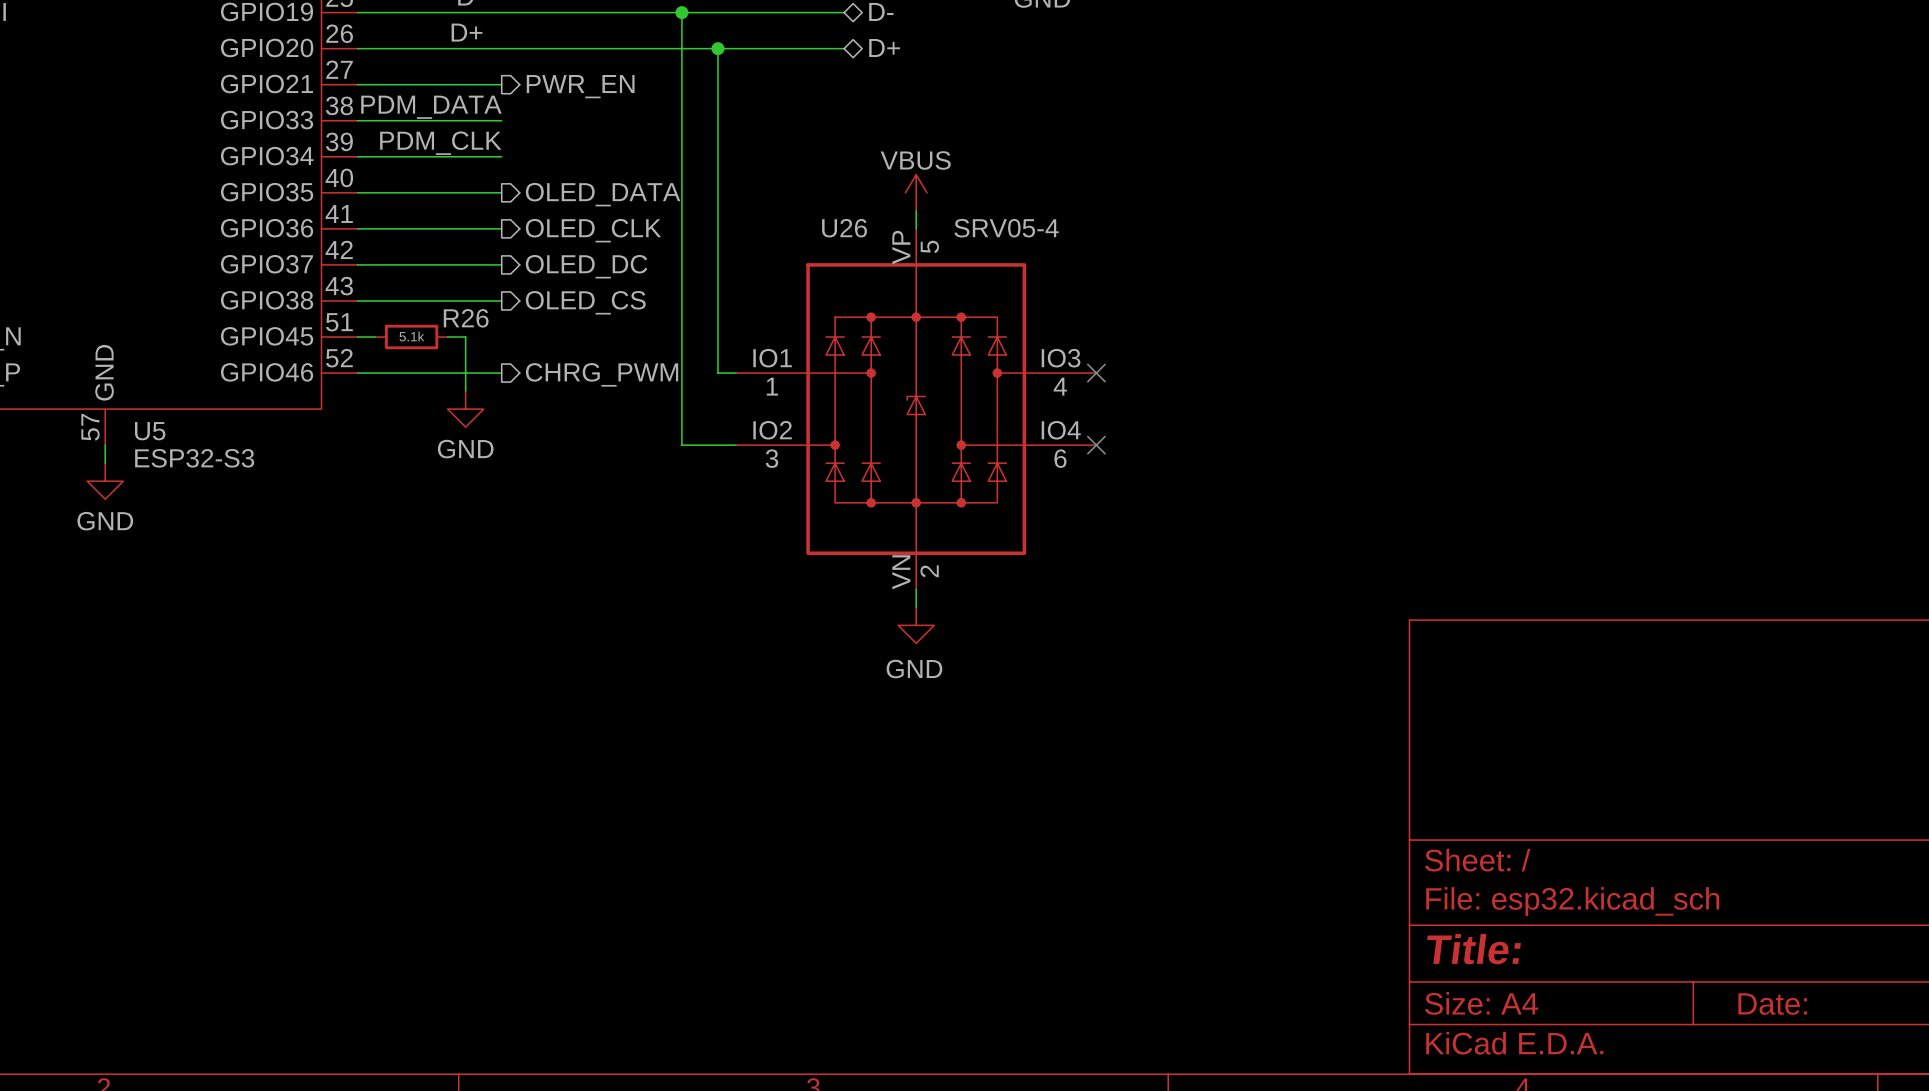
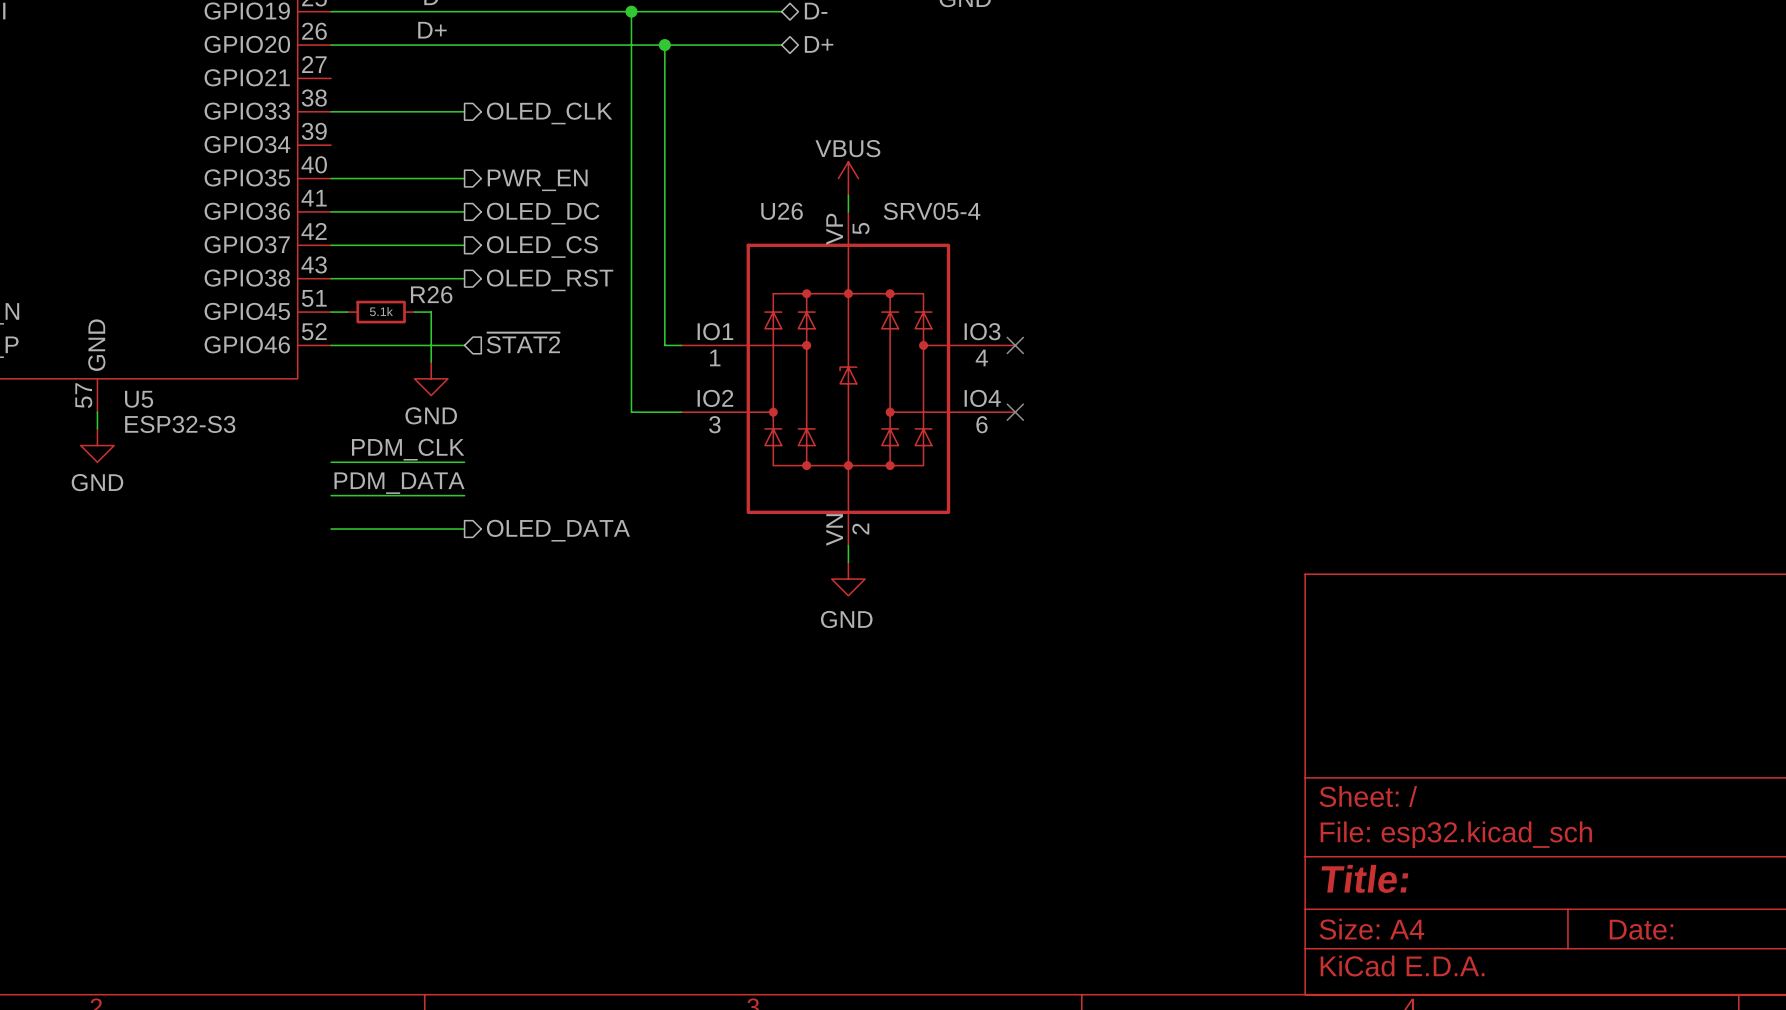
wire: (357, 84) (501, 84) -> none
hierarchical label: PWR_EN (580, 86) -> none
label: PDM_DATA (431, 107) -> none
hierarchical label: none -> OLED_CLK (549, 113)
label position: PDM_CLK (440, 143) -> PDM_CLK (408, 449)
wire: (357, 156) (501, 156) -> (331, 462) (464, 462)
hierarchical label: OLED_DATA (603, 194) -> PWR_EN (537, 180)
hierarchical label: OLED_CLK (593, 230) -> OLED_DC (543, 213)
hierarchical label: OLED_DC (586, 266) -> OLED_CS (542, 246)
hierarchical label: OLED_CS (585, 302) -> OLED_RST (550, 280)
hierarchical label shape: output (602, 374) -> input (523, 343)
hierarchical label: CHRG_PWM (602, 374) -> ~{STAT2} (523, 343)
label: none -> PDM_DATA (399, 483)
wire: none -> (331, 495) (464, 495)
wire: none -> (331, 529) (464, 529)
hierarchical label: none -> OLED_DATA (558, 530)

